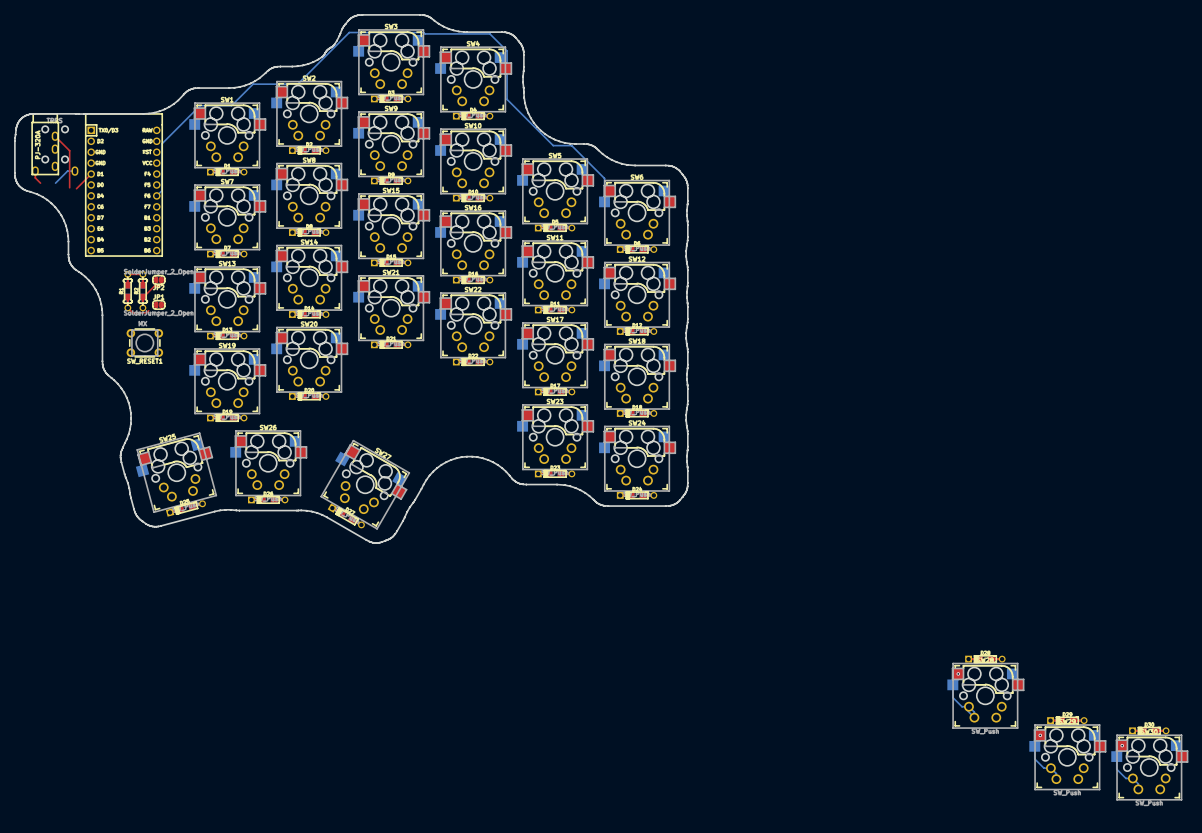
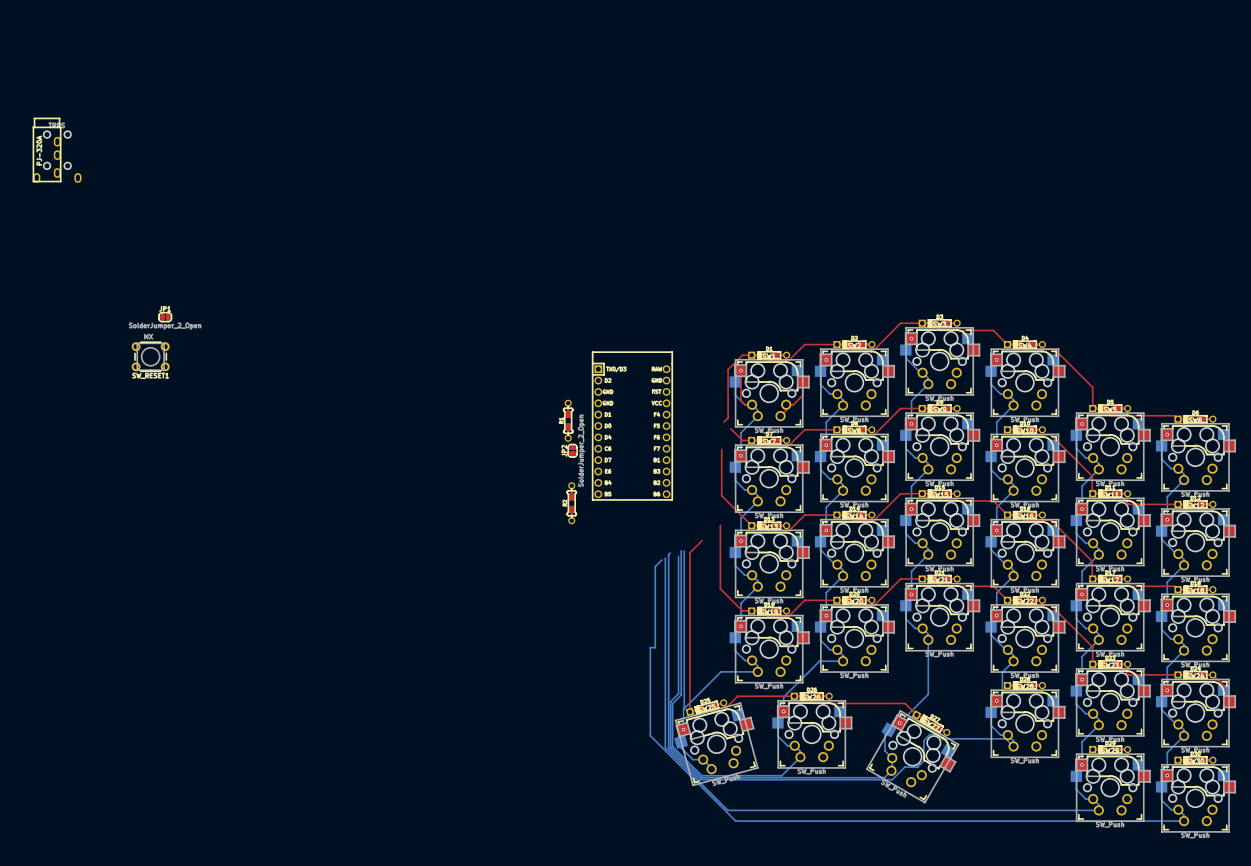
board edge: (362, 14) (354, 16) (348, 20) (333, 45) (318, 59) (302, 65) (273, 67) (255, 80) (244, 85) (192, 88) (169, 106) (153, 112) (31, 114) (23, 117) (17, 123) (14, 141) (16, 181) (23, 189) (46, 199) (58, 211) (67, 230) (70, 263) (89, 280) (100, 299) (102, 314) (103, 367) (121, 388) (130, 408) (130, 428) (120, 457) (136, 515) (147, 524) (156, 526) (220, 510) (307, 510) (322, 515) (369, 541) (379, 542) (389, 538) (395, 534) (426, 480) (433, 471) (450, 460) (467, 456) (482, 458) (493, 462) (519, 483) (569, 486) (584, 492) (603, 505) (665, 506) (675, 503) (685, 492) (687, 483) (686, 333) (687, 270) (686, 251) (687, 188) (685, 178) (678, 170) (672, 166) (621, 163) (607, 157) (591, 145) (560, 141) (541, 131) (531, 118) (525, 103) (523, 48) (516, 38) (510, 33) (453, 30) (423, 15) (362, 14) -> none
part position: (391, 62) -> (939, 361)
part position: (473, 79) -> (1025, 382)
part position: (391, 98) -> (939, 323)
part position: (309, 113) -> (854, 382)
part position: (473, 116) -> (1024, 344)
part position: (227, 135) -> (769, 393)
top track: (55, 136) (69, 150) (69, 187) -> none
part position: (391, 144) -> (939, 446)
part position: (309, 150) -> (854, 344)
part position: (473, 161) -> (1025, 467)
top track: (35, 171) (35, 177) (40, 183) -> none
bottom track: (74, 171) (67, 171) (55, 183) -> none
part position: (227, 172) -> (769, 355)
top track: (91, 174) (76, 188) -> none
part position: (391, 180) -> (939, 408)
part: (123, 184) -> none
part position: (555, 191) -> (1110, 446)
bottom track: (156, 195) (161, 190) (161, 143) (200, 105) (231, 105) (253, 84) (297, 84) (349, 32) (423, 32) (489, 33) (507, 51) (507, 99) (553, 145) (571, 145) (604, 178) (604, 201) -> none
part position: (309, 195) -> (854, 467)
part position: (473, 198) -> (1024, 429)
part position: (637, 212) -> (1195, 457)
part position: (227, 217) -> (769, 478)
part position: (391, 226) -> (939, 531)
part position: (555, 227) -> (1110, 408)
part position: (309, 232) -> (854, 429)
part position: (473, 243) -> (1025, 553)
part position: (637, 249) -> (1195, 419)
part position: (227, 254) -> (769, 440)
part position: (391, 262) -> (939, 493)
part position: (555, 273) -> (1110, 531)
top track: (127, 274) (142, 274) -> none
part position: (309, 277) -> (854, 553)
part rotation: 0° (158, 279) -> 90° clockwise (572, 450)
part position: (158, 279) -> (572, 450)
top track: (163, 279) (143, 296) -> none
part position: (473, 280) -> (1024, 515)
part position: (127, 291) -> (568, 420)
part position: (142, 291) -> (571, 503)
part position: (637, 294) -> (1195, 542)
part position: (227, 299) -> (769, 563)
top track: (127, 307) (132, 312) (146, 312) (148, 310) -> none
part position: (391, 308) -> (939, 617)
part position: (555, 309) -> (1110, 493)
top track: none -> (922, 323) (900, 323) (874, 349) (853, 349) (848, 344)
top track: none -> (933, 323) (940, 330) (993, 330) (1007, 344)
part position: (309, 314) -> (854, 515)
part position: (473, 325) -> (1025, 638)
bottom track: none -> (911, 338) (905, 344) (905, 358) (928, 378) (928, 384) (911, 400) (911, 429) (905, 435) (905, 448) (915, 458) (922, 458) (928, 463) (928, 469) (911, 486) (911, 514) (905, 520) (905, 533) (915, 543) (922, 543) (928, 548) (928, 554) (911, 571) (911, 600) (905, 605) (905, 618) (915, 628) (922, 628) (928, 634) (928, 694) (892, 730) (889, 730) (884, 734) (884, 750) (892, 758) (892, 770) (884, 777) (700, 777) (670, 747) (670, 701) (678, 693) (678, 556)
via: none -> (911, 338)
part position: (637, 331) -> (1195, 504)
top track: none -> (836, 344) (804, 344) (789, 360) (767, 360) (762, 355)
top track: none -> (1018, 344) (1023, 349) (1054, 349) (1092, 387) (1092, 408)
part position: (227, 335) -> (769, 525)
top track: none -> (751, 355) (742, 355) (728, 369) (728, 417) (723, 422)
part position: (391, 344) -> (939, 579)
bottom track: none -> (826, 359) (820, 365) (820, 384) (830, 394) (837, 394) (843, 399) (843, 405) (826, 422) (826, 450) (820, 456) (820, 469) (830, 479) (837, 479) (843, 485) (843, 490) (826, 507) (826, 530)
via: none -> (826, 359)
bottom track: none -> (996, 359) (991, 365) (991, 384) (1000, 394) (1007, 394) (1013, 399) (1013, 405) (996, 422) (996, 450) (991, 456) (991, 469) (1000, 479) (1007, 479) (1013, 485) (1013, 490) (996, 507) (996, 536) (991, 541) (991, 549) (1013, 570) (1013, 575) (996, 592) (996, 621) (991, 627) (991, 635) (1013, 655) (1013, 661) (1002, 672) (1002, 695) (996, 701)
via: none -> (996, 359)
part position: (555, 355) -> (1110, 617)
top track: none -> (741, 370) (741, 400) (744, 404) (752, 404)
bottom track: none -> (741, 370) (735, 376) (735, 395) (744, 404) (752, 404) (757, 410) (757, 416) (741, 432) (741, 461) (735, 467) (735, 480) (744, 489) (752, 489) (757, 495) (757, 501) (741, 518) (741, 546) (735, 552) (735, 565) (744, 575) (752, 575) (757, 580) (757, 586) (741, 603) (741, 632) (735, 637) (735, 650) (744, 660) (752, 660) (757, 666) (757, 671) (721, 671) (683, 709) (683, 739) (681, 742) (681, 747) (692, 759) (703, 759) (711, 769)
via: none -> (741, 370)
part position: (309, 359) -> (854, 638)
part position: (473, 362) -> (1024, 600)
top track: none -> (803, 382) (803, 395) (793, 404) (786, 404) (786, 410) (780, 416)
part position: (637, 376) -> (1195, 627)
part position: (227, 381) -> (769, 649)
part position: (555, 391) -> (1110, 579)
top track: none -> (922, 408) (900, 408) (874, 434) (853, 434) (848, 429)
top track: none -> (1103, 408) (1111, 415) (1174, 415) (1177, 419)
part position: (309, 396) -> (854, 600)
via: none -> (911, 423)
bottom track: none -> (1082, 423) (1076, 429) (1076, 448) (1085, 458) (1093, 458) (1098, 463) (1098, 469) (1082, 486) (1082, 514) (1076, 520) (1076, 533) (1085, 543) (1093, 543) (1098, 548) (1098, 554) (1082, 571) (1082, 600) (1076, 605) (1076, 618) (1085, 628) (1093, 628) (1098, 634) (1098, 639) (1082, 656) (1082, 685) (1076, 691) (1076, 704) (1085, 713) (1093, 713) (1098, 719) (1098, 725) (1082, 741) (1082, 764)
via: none -> (1082, 423)
part: none -> (632, 426)
top track: none -> (730, 428) (742, 440) (751, 440)
part position: (637, 413) -> (1195, 589)
top track: none -> (836, 429) (804, 429) (789, 445) (767, 445) (762, 440)
top track: none -> (1018, 429) (1023, 434) (1050, 434) (1092, 476) (1092, 493)
part position: (227, 417) -> (769, 610)
bottom track: none -> (1167, 434) (1161, 440) (1161, 459) (1171, 468) (1178, 468) (1184, 474) (1184, 480) (1167, 496) (1167, 525) (1161, 531) (1161, 539) (1184, 559) (1184, 565) (1167, 582) (1167, 610) (1161, 616) (1161, 629) (1171, 639) (1178, 639) (1184, 644) (1184, 650) (1167, 667) (1167, 696) (1161, 701) (1161, 709) (1184, 730) (1184, 735) (1167, 752) (1167, 775)
via: none -> (1167, 434)
via: none -> (826, 445)
via: none -> (996, 445)
top track: none -> (721, 449) (721, 495) (751, 525)
part position: (555, 437) -> (1110, 702)
via: none -> (741, 455)
part position: (637, 458) -> (1195, 713)
part position: (268, 463) -> (812, 734)
part position: (176, 472) -> (716, 744)
part position: (555, 473) -> (1110, 664)
top track: none -> (922, 493) (900, 493) (874, 520) (853, 520) (848, 515)
top track: none -> (933, 493) (940, 501) (993, 501) (1007, 515)
top track: none -> (1103, 493) (1108, 497) (1122, 497) (1128, 504) (1177, 504)
part position: (365, 484) -> (912, 756)
via: none -> (911, 509)
via: none -> (1082, 509)
part position: (637, 495) -> (1195, 674)
top track: none -> (836, 515) (804, 515) (789, 530) (767, 530) (762, 525)
top track: none -> (1018, 515) (1023, 520) (1050, 520) (1092, 561) (1092, 579)
part position: (268, 499) -> (811, 696)
via: none -> (1167, 519)
top track: none -> (720, 525) (720, 588) (742, 610) (751, 610)
part position: (185, 508) -> (706, 707)
via: none -> (826, 530)
via: none -> (996, 530)
part position: (346, 515) -> (931, 723)
top track: none -> (702, 540) (689, 552) (689, 711)
via: none -> (741, 541)
bottom track: none -> (820, 541) (820, 549) (843, 570) (843, 575) (826, 592) (826, 621) (820, 627) (820, 640) (830, 649) (837, 649) (843, 655) (843, 661) (819, 661) (783, 697) (783, 717) (777, 723) (777, 736) (787, 745) (794, 745) (800, 751) (800, 757) (781, 775) (701, 775) (672, 746) (672, 703) (681, 695) (681, 550)
bottom track: none -> (684, 551) (684, 708)
bottom track: none -> (670, 553) (668, 554) (668, 748) (700, 779) (892, 779) (904, 767) (917, 767) (923, 760) (923, 740) (929, 734) (937, 734) (942, 738) (1005, 738)
bottom track: none -> (665, 558) (665, 747) (727, 810) (1098, 810)
bottom track: none -> (661, 559) (655, 566) (655, 647) (650, 647) (650, 735) (735, 821) (1184, 821)
top track: none -> (922, 579) (900, 579) (874, 605) (853, 605) (848, 600)
top track: none -> (933, 579) (940, 586) (993, 586) (1007, 600)
top track: none -> (1103, 579) (1111, 586) (1174, 586) (1177, 589)
via: none -> (911, 594)
via: none -> (1082, 594)
top track: none -> (836, 600) (804, 600) (789, 616) (767, 616) (762, 610)
top track: none -> (1018, 600) (1023, 605) (1050, 605) (1092, 647) (1092, 664)
via: none -> (1167, 605)
via: none -> (826, 615)
via: none -> (996, 615)
via: none -> (741, 626)
top track: none -> (1103, 664) (1108, 668) (1122, 668) (1128, 674) (1177, 674)
top track: none -> (1212, 674) (1223, 685) (1223, 696) (1229, 701)
via: none -> (1082, 679)
via: none -> (1167, 690)
top track: none -> (794, 696) (737, 696) (722, 711) (702, 711) (700, 709)
top track: none -> (805, 696) (812, 703) (905, 703) (916, 715)
via: none -> (783, 711)
via: none -> (899, 723)
via: none -> (683, 729)

